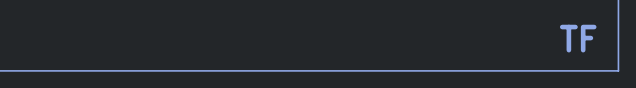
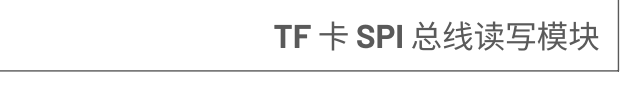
text: TF (578, 38) -> TF 卡 SPI 总线读写模块 (436, 36)

